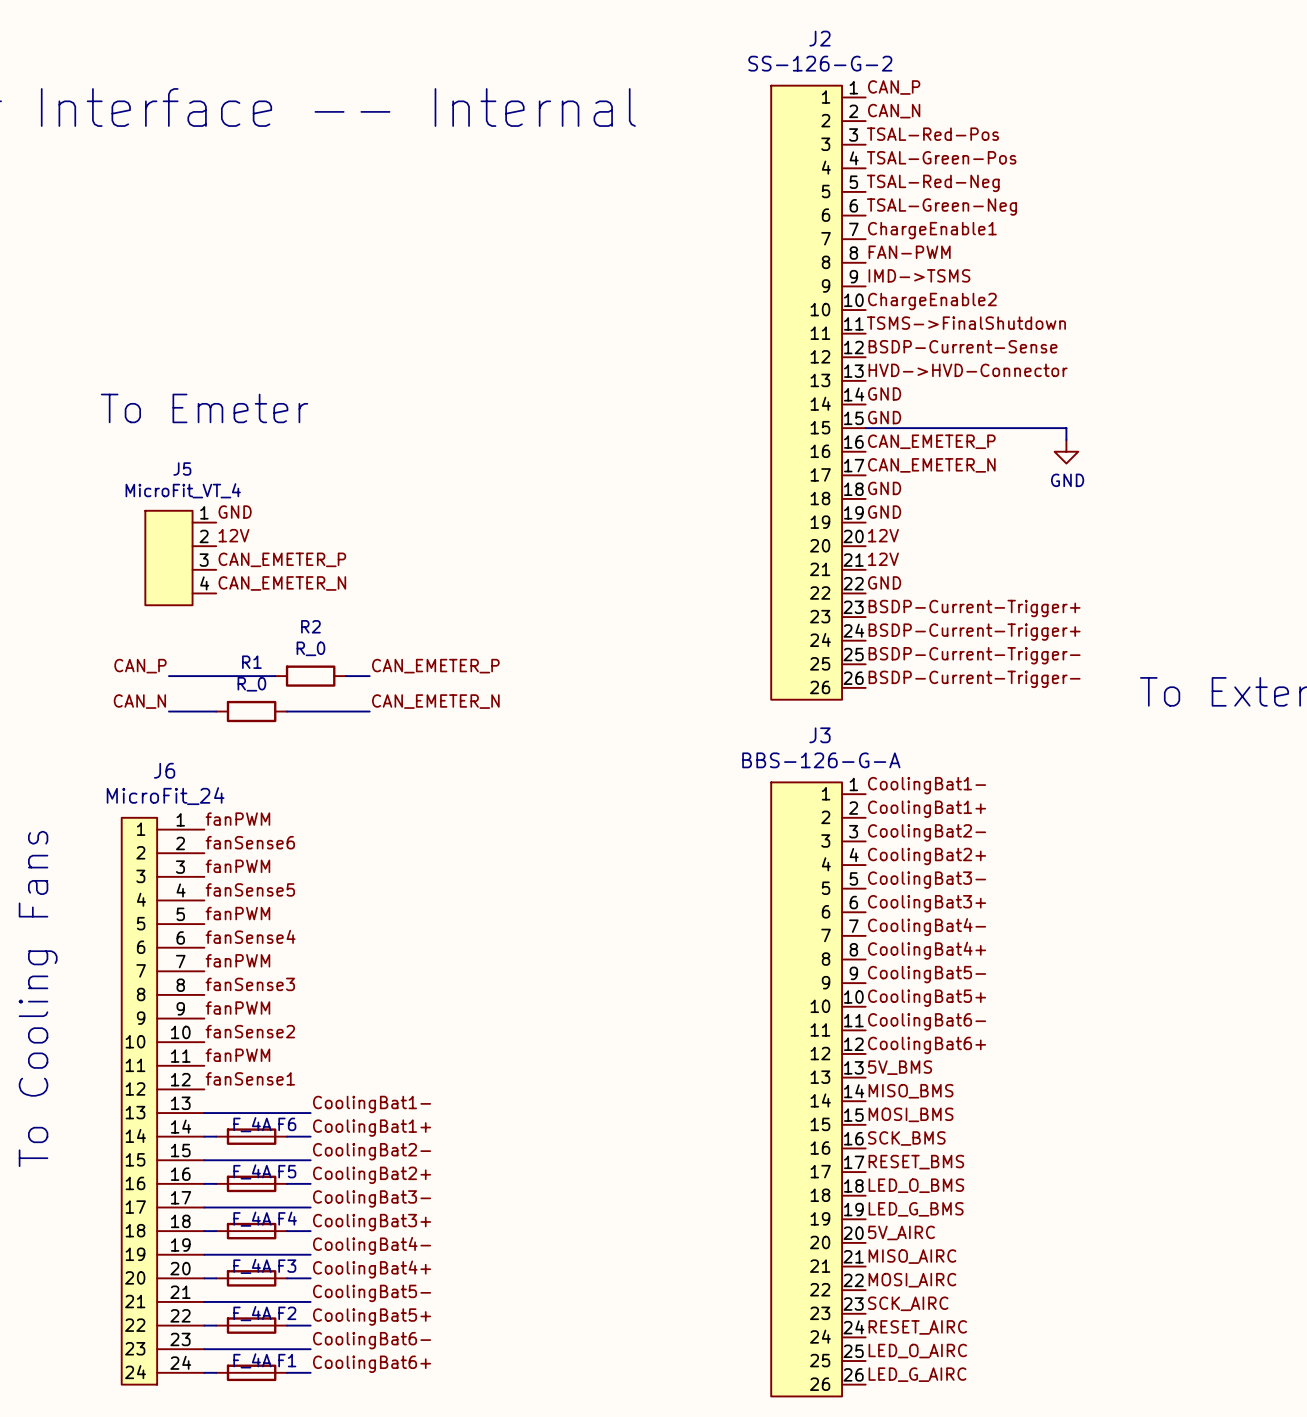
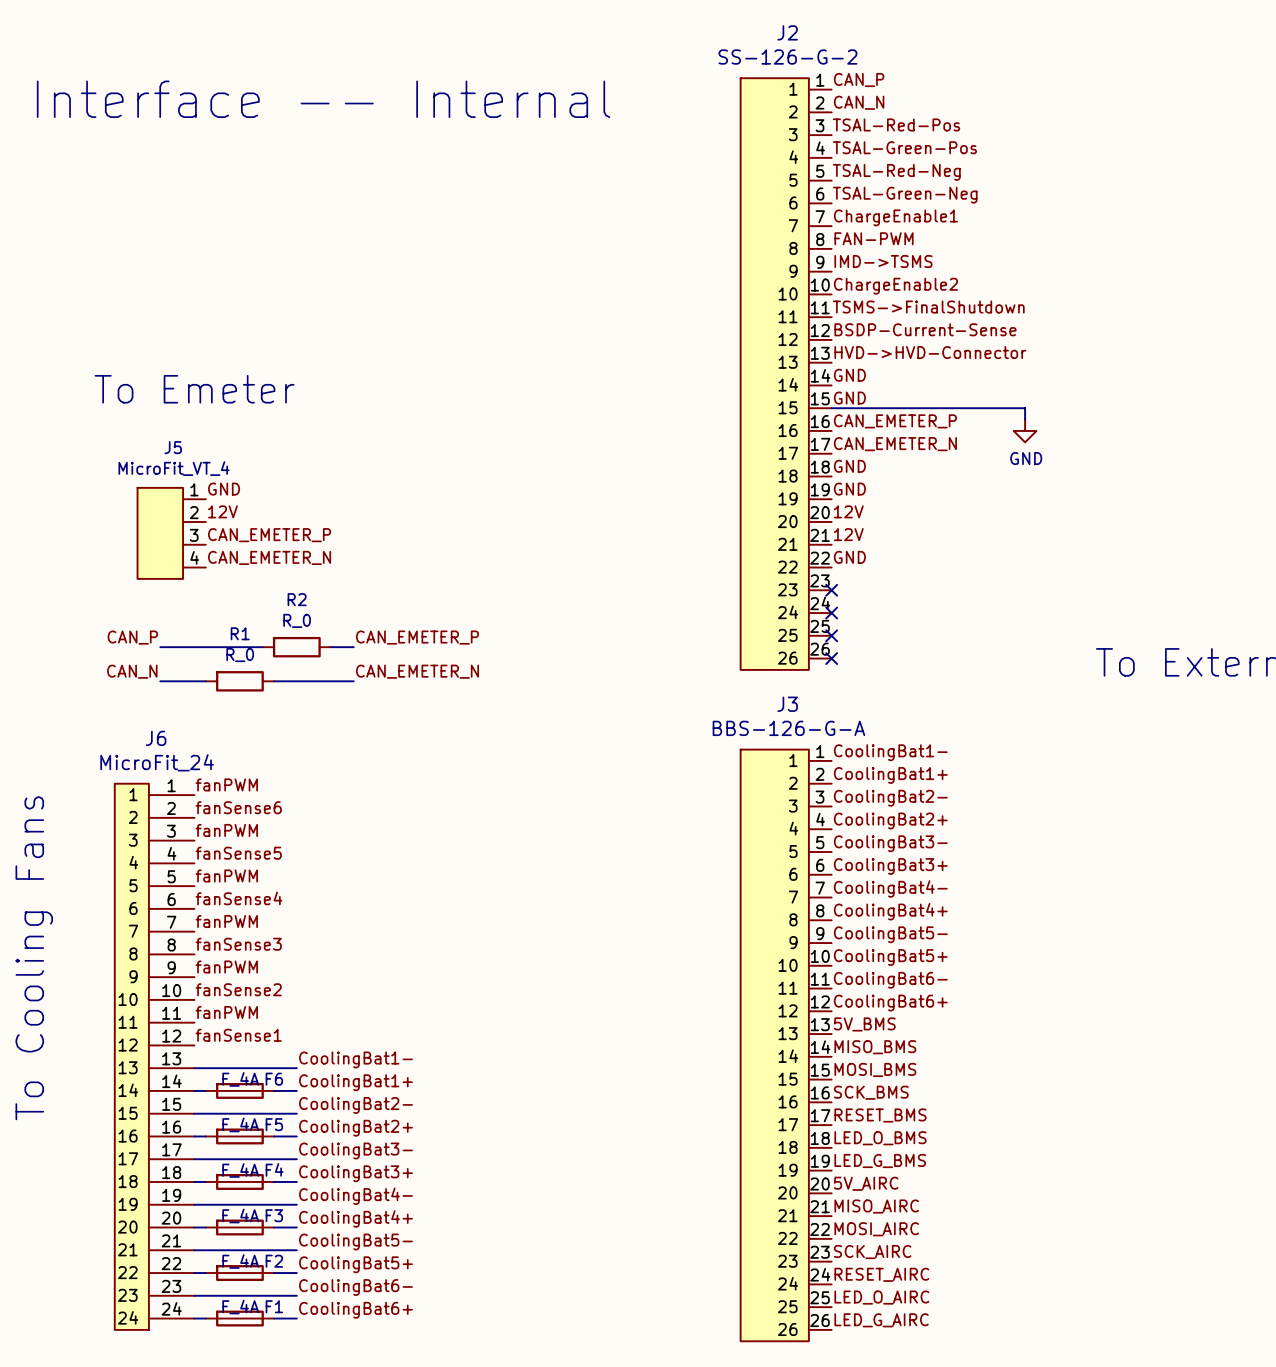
label: BSDP-Current-Trigger+ (974, 608) -> none
no-connect mark: none -> (831, 590)
label: BSDP-Current-Trigger+ (974, 632) -> none
no-connect mark: none -> (831, 613)
label: BSDP-Current-Trigger- (974, 655) -> none
no-connect mark: none -> (831, 635)
label: BSDP-Current-Trigger- (974, 679) -> none
no-connect mark: none -> (831, 658)

